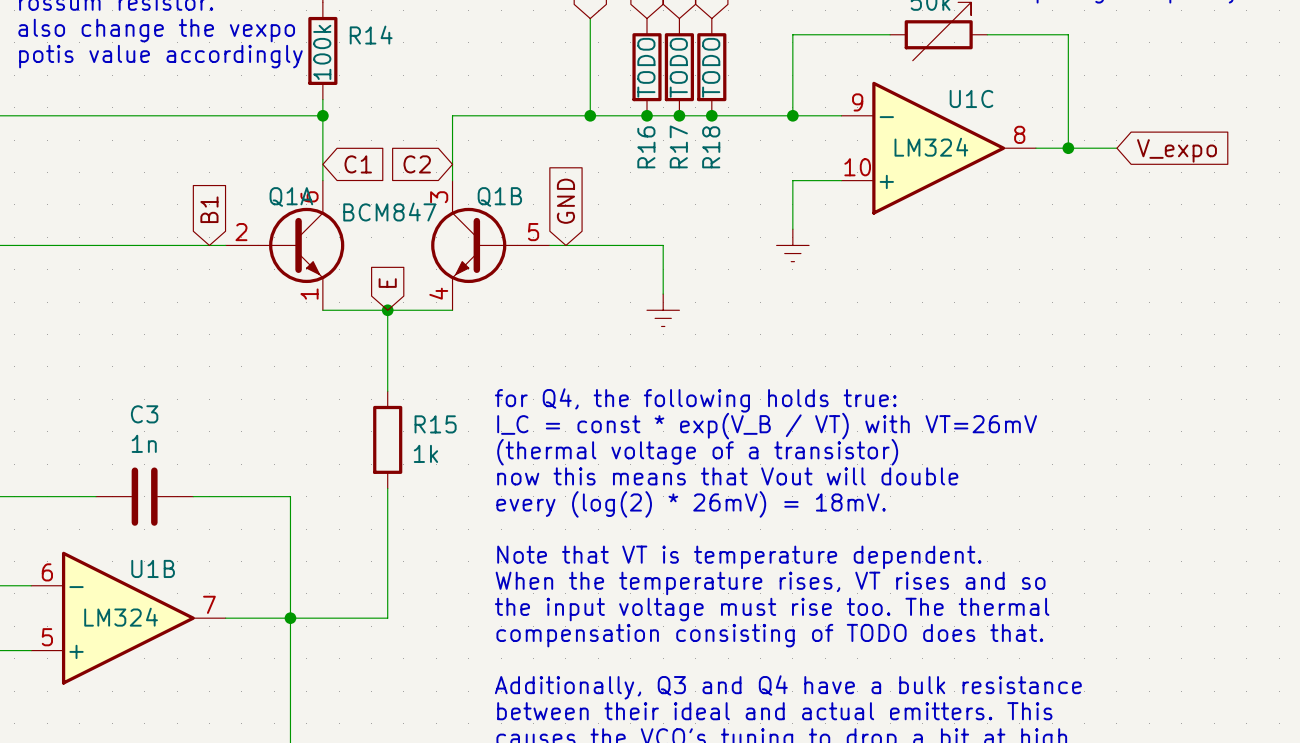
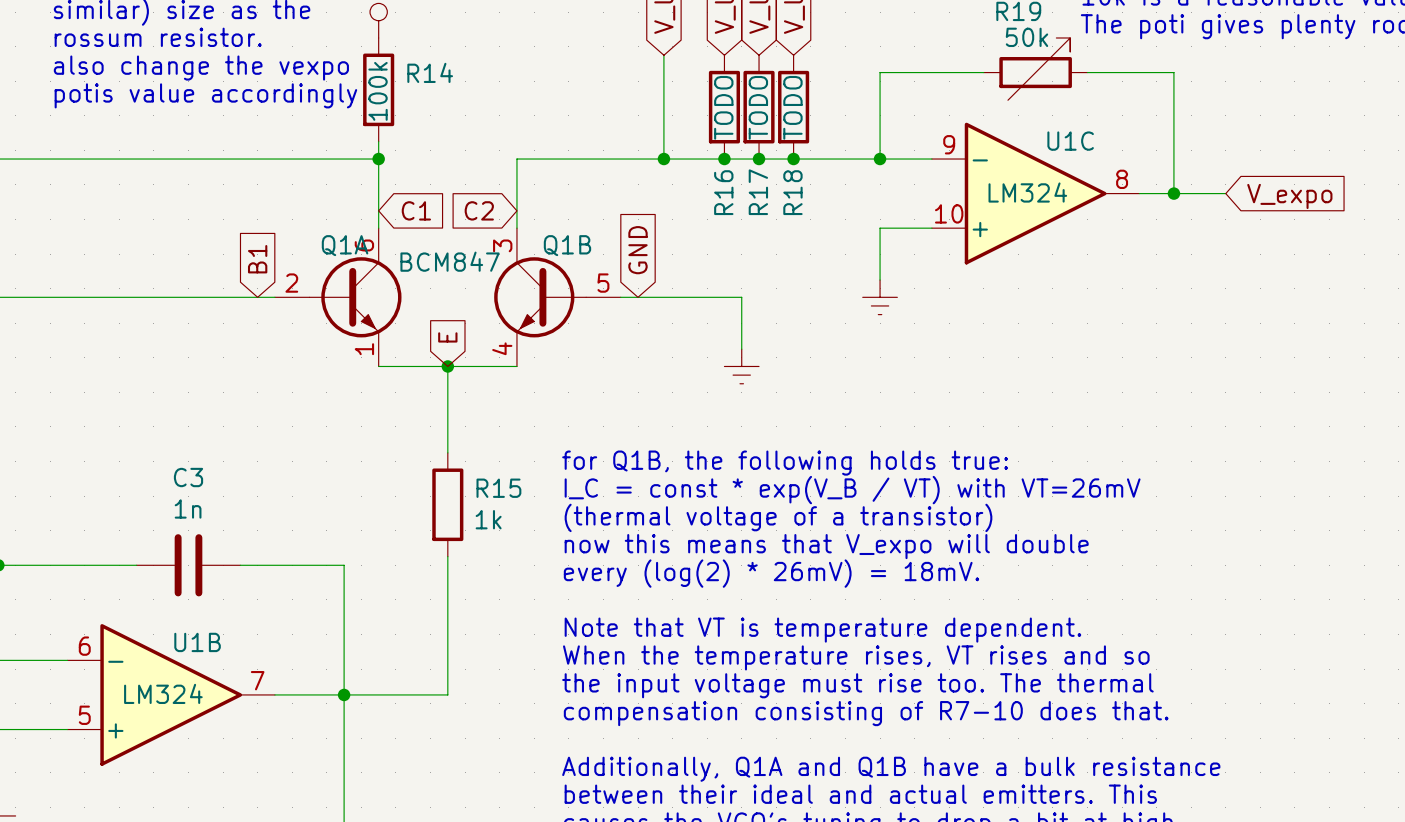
text: for Q4, the following holds true: (695, 400) -> for Q1B, the following holds true: (785, 463)
text: now this means that Vout will double (727, 476) -> now this means that V_expo will double (826, 546)
text: compensation consisting of TODO does that. (769, 635) -> compensation consisting of R7-10 does that. (866, 713)
text: Additionally, Q3 and Q4 have a bulk resistance (788, 687) -> Additionally, Q1A and Q1B have a bulk resistance (891, 769)

